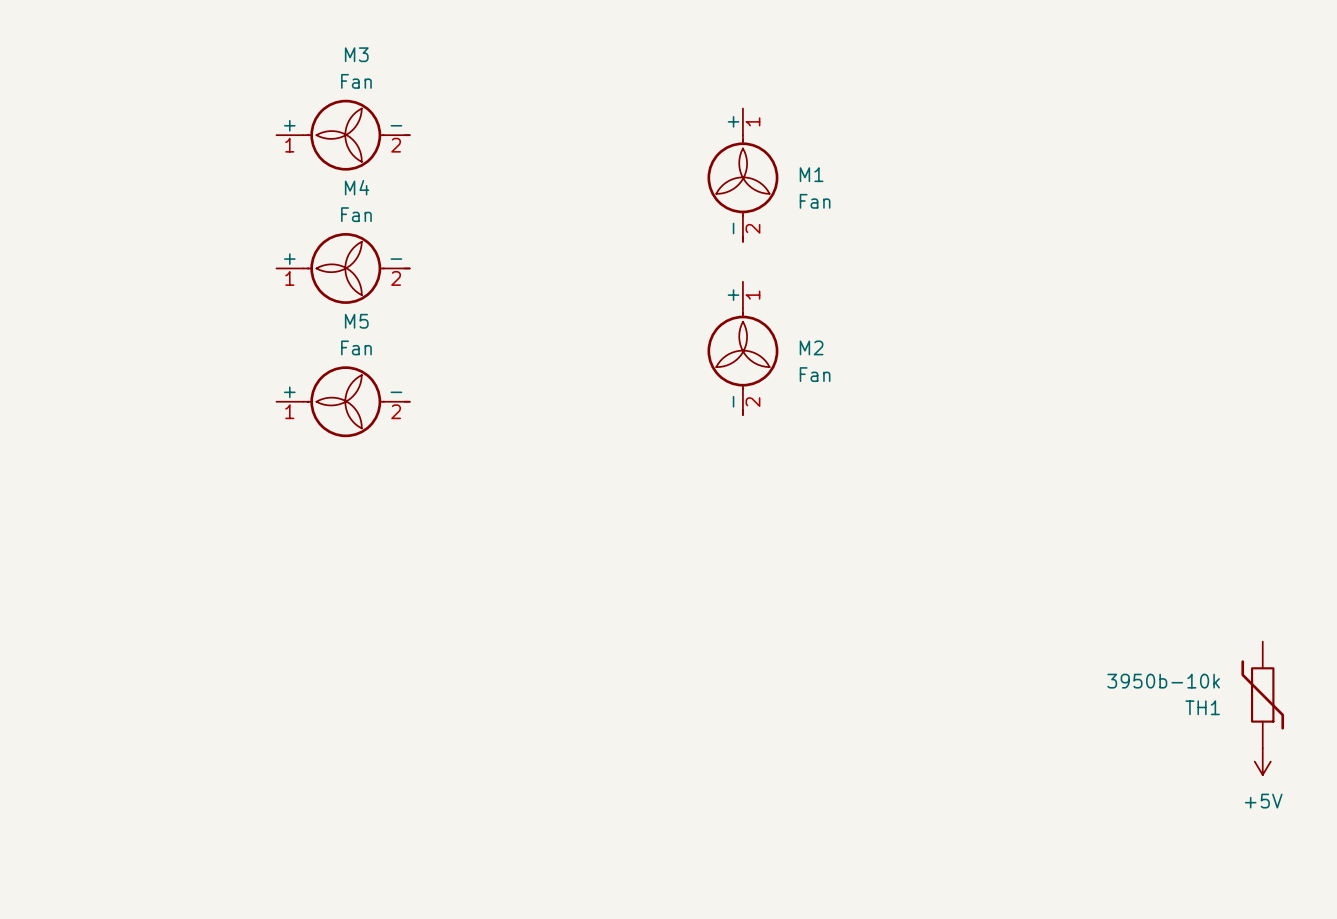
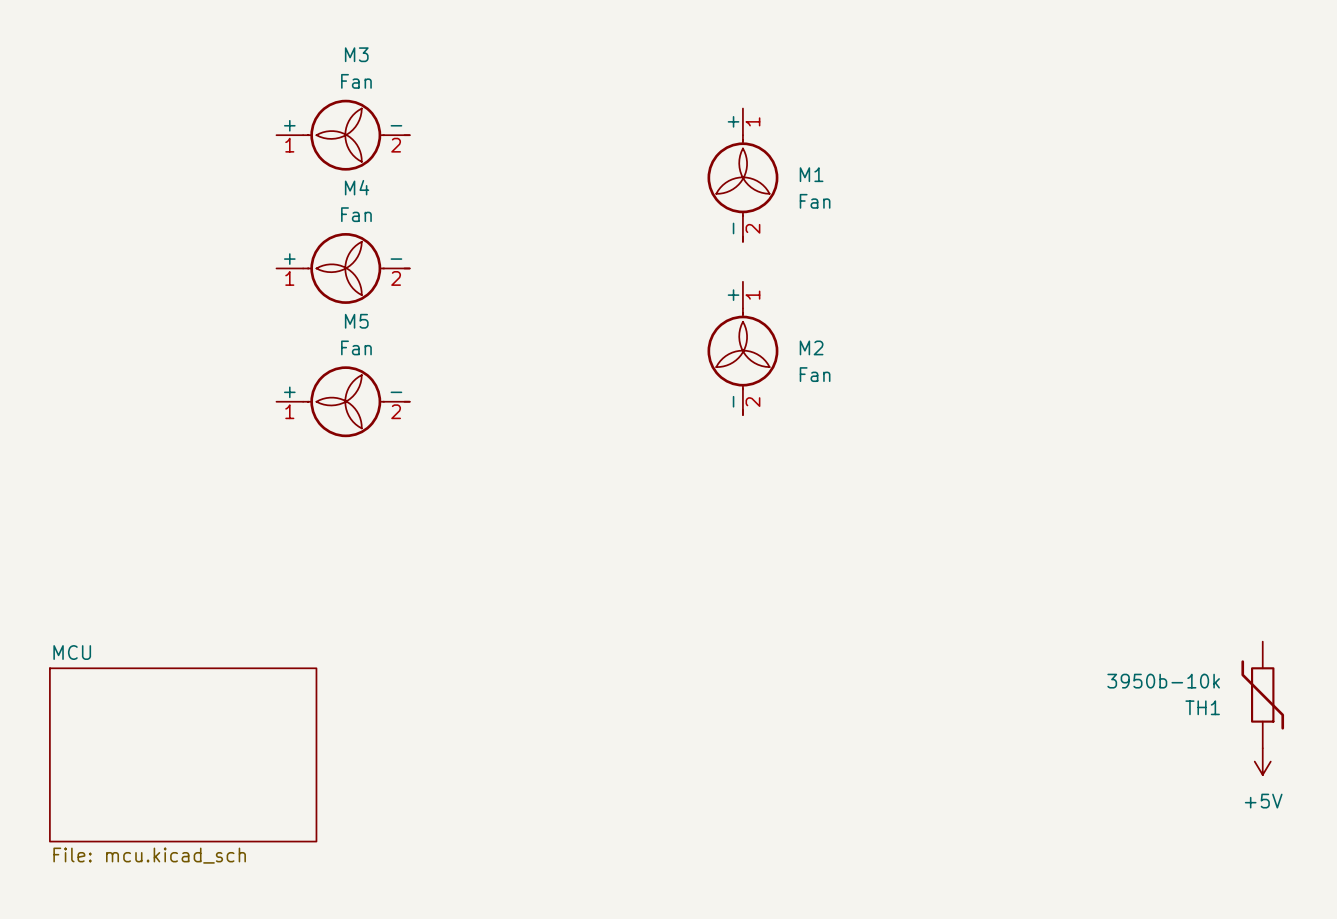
sheet MCU: none -> File: mcu.kicad_sch (183, 754)

